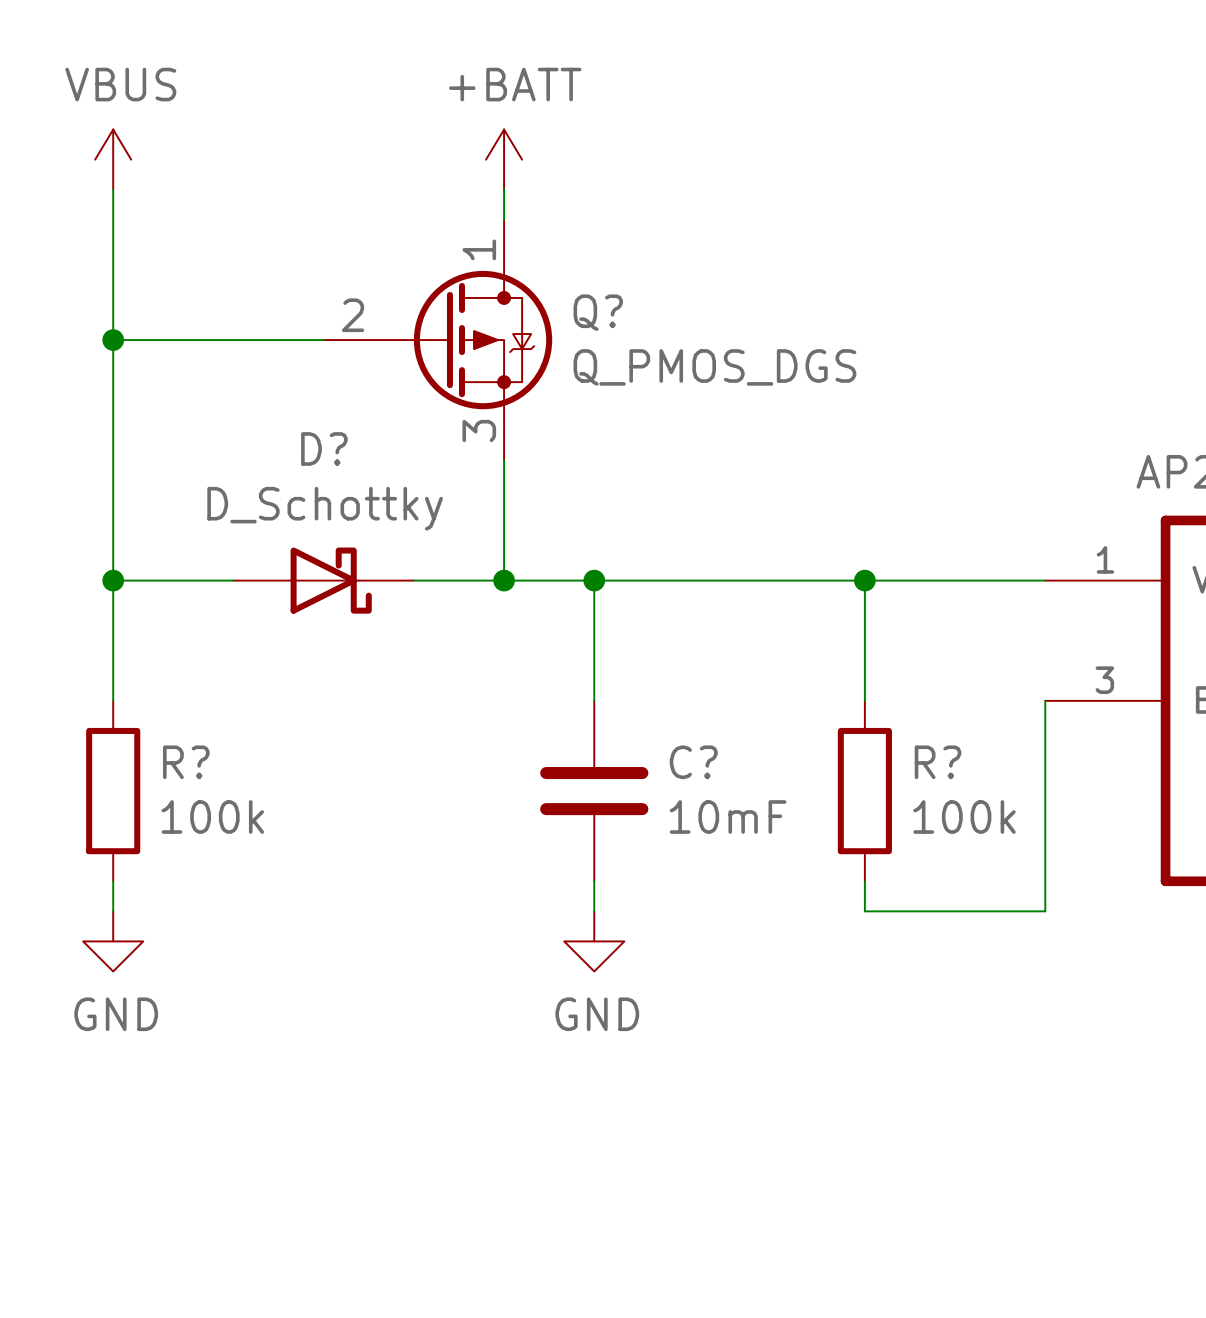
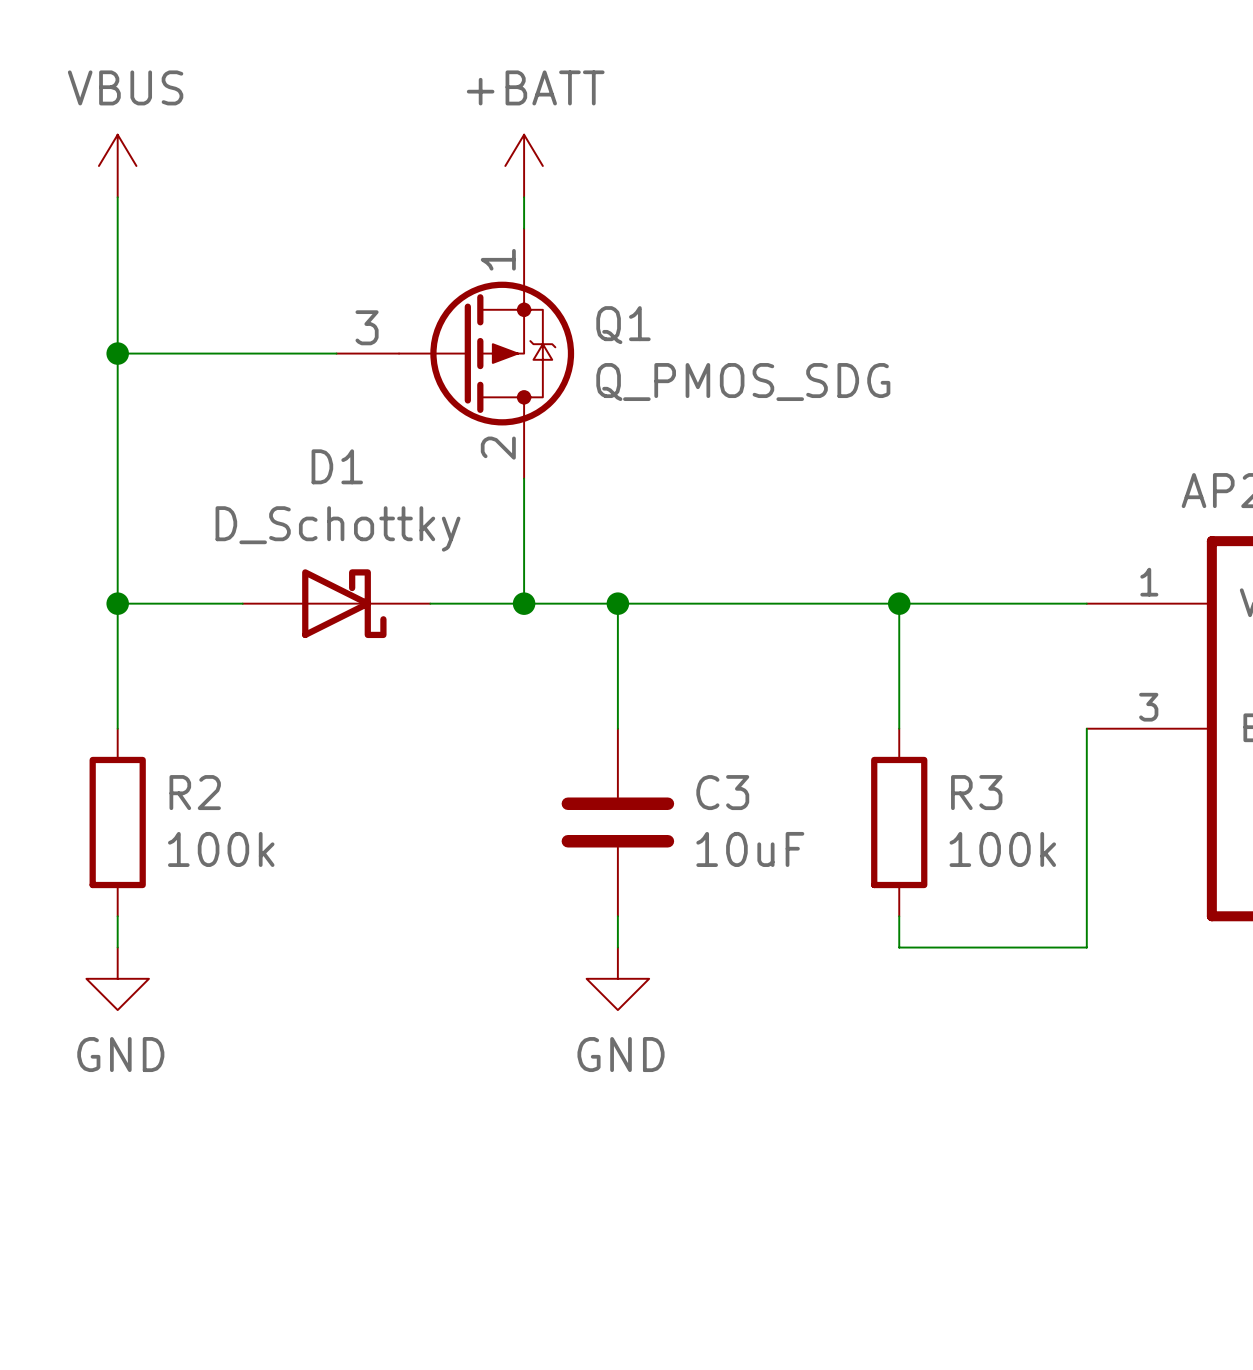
Q?: Q_PMOS_DGS (437, 340) -> none
Q1: none -> Q_PMOS_SDG (455, 353)
D? name: D? (324, 448) -> D1 (337, 466)
R? name: R? (186, 762) -> R2 (195, 792)
C? name: C? (693, 762) -> C3 (722, 792)
R? name: R? (937, 762) -> R3 (976, 792)
C? value: 10mF (728, 817) -> 10uF (750, 849)

